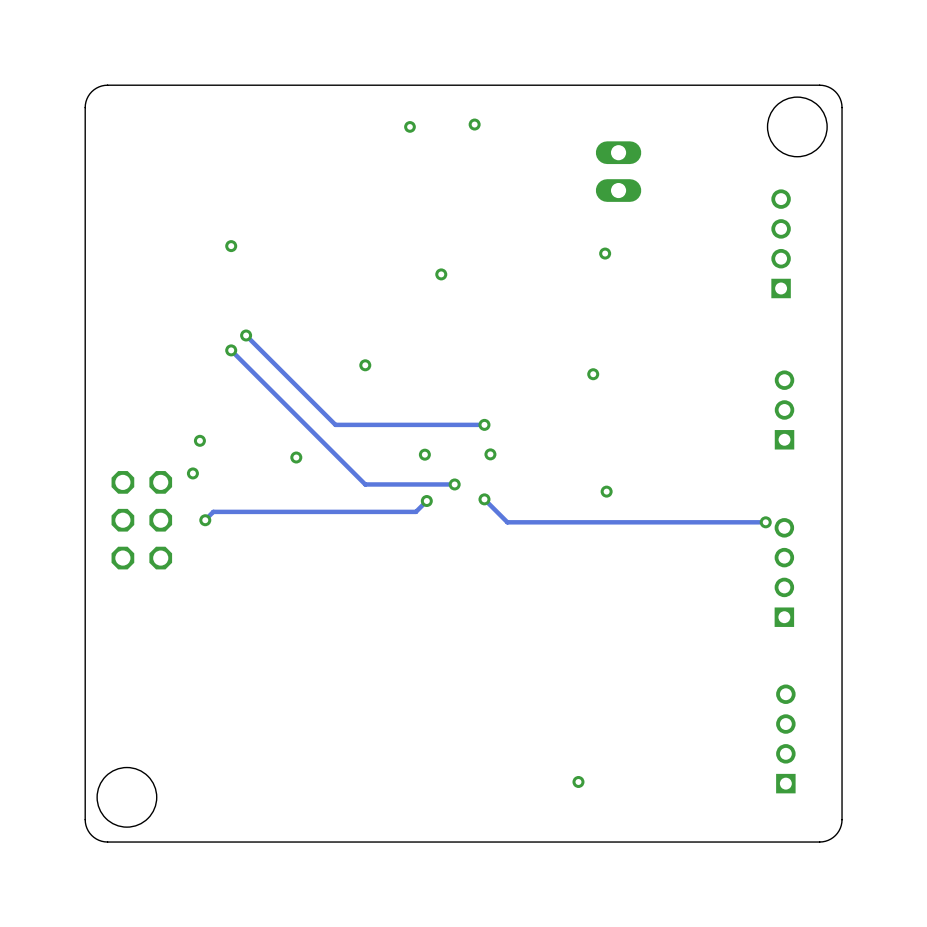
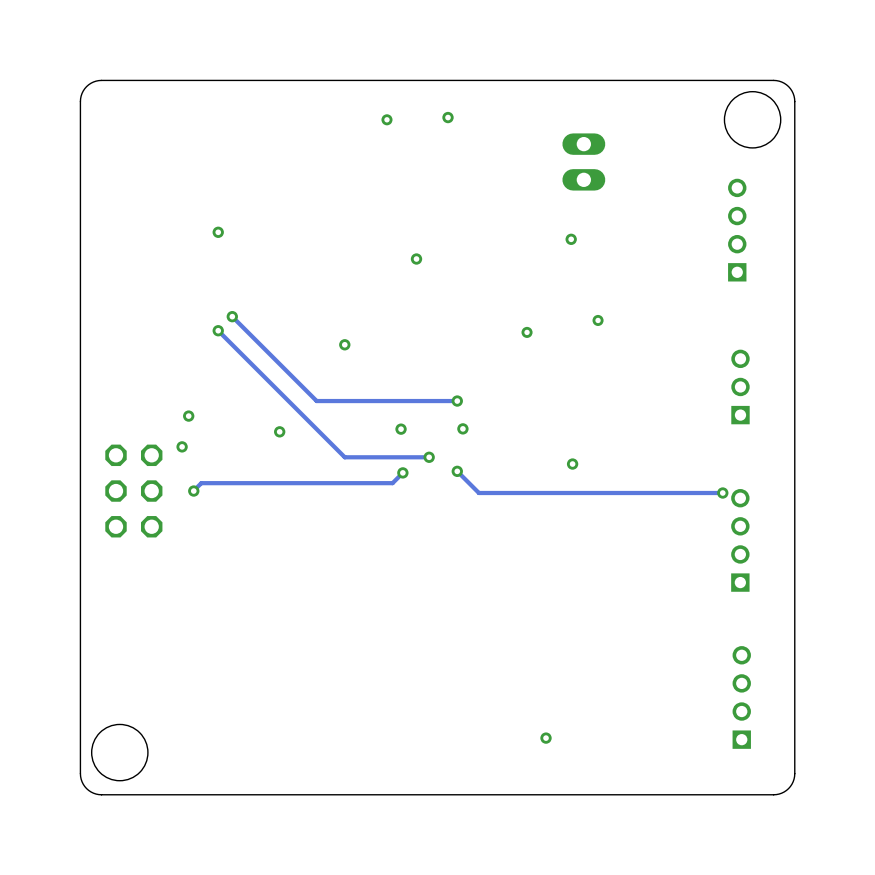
via: none -> (598, 320)
via: none -> (527, 332)
via: (593, 374) -> none

